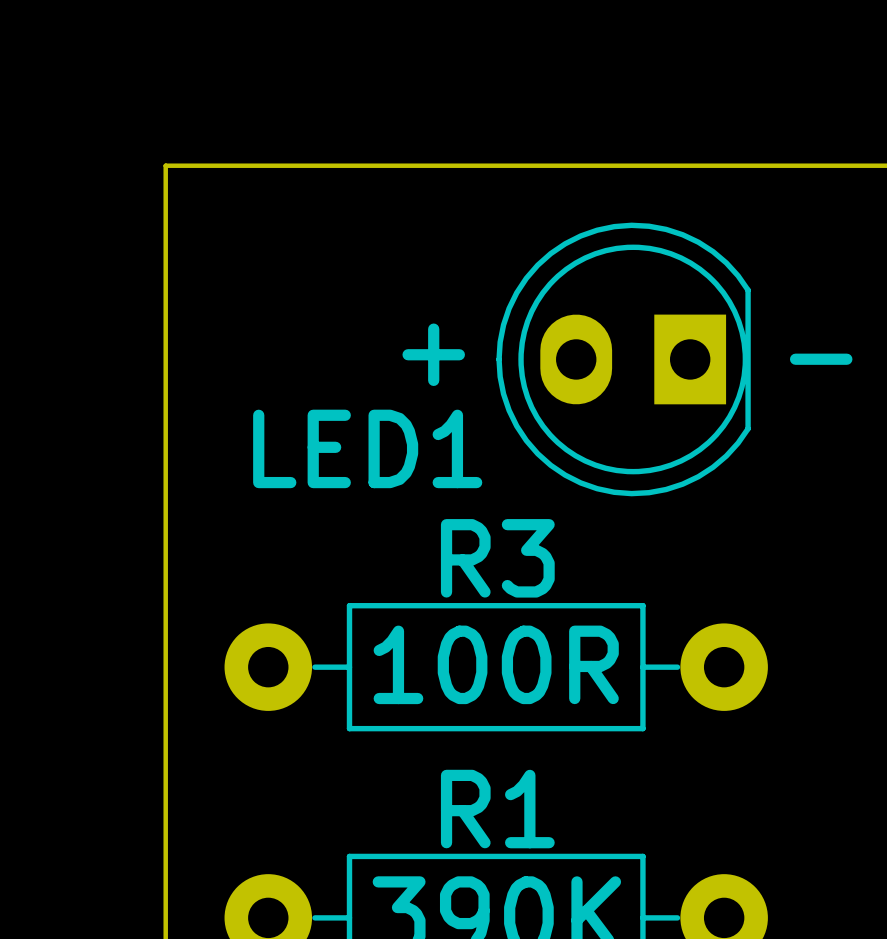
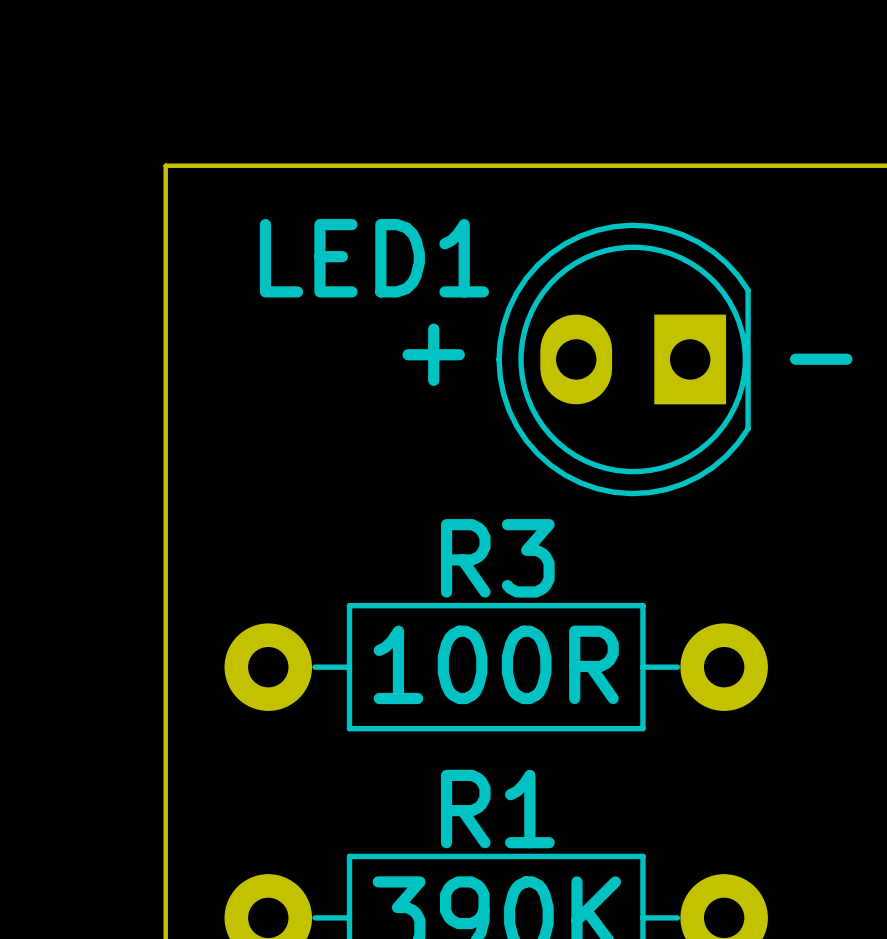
LED1 name position: LED1 (367, 448) -> LED1 (374, 258)

